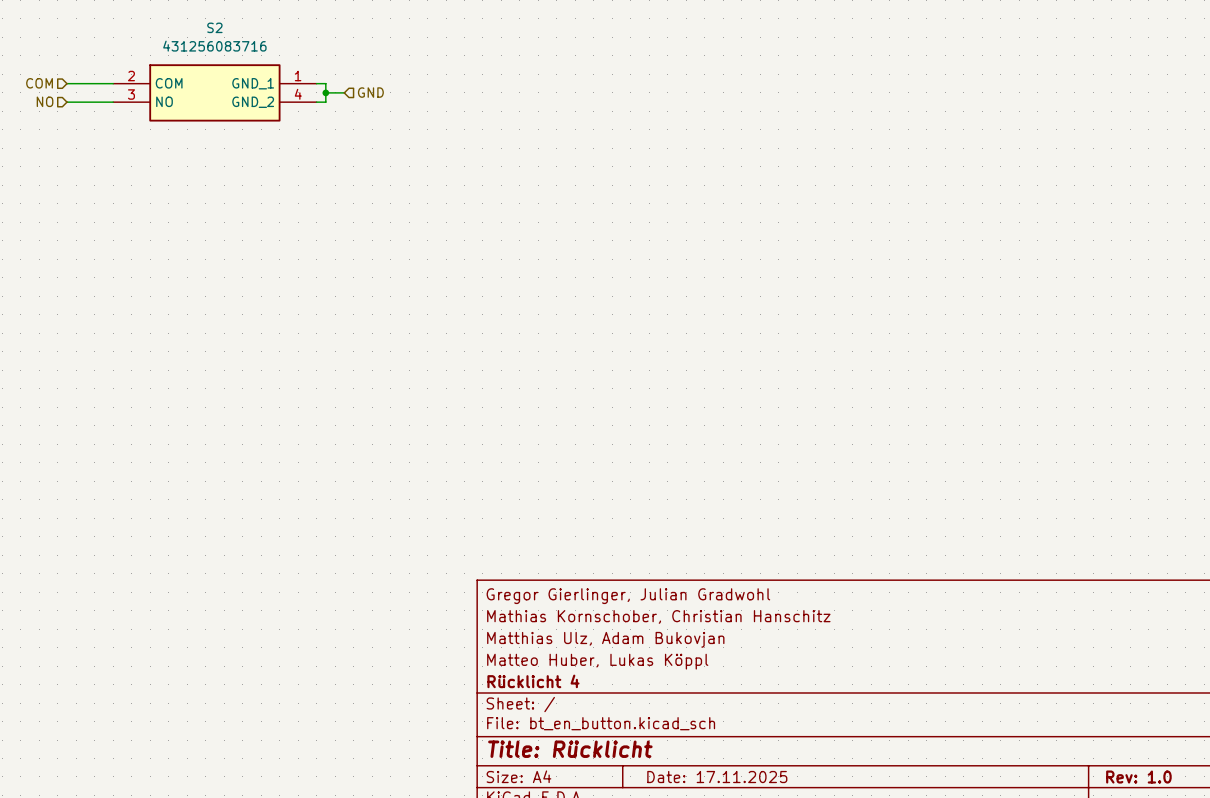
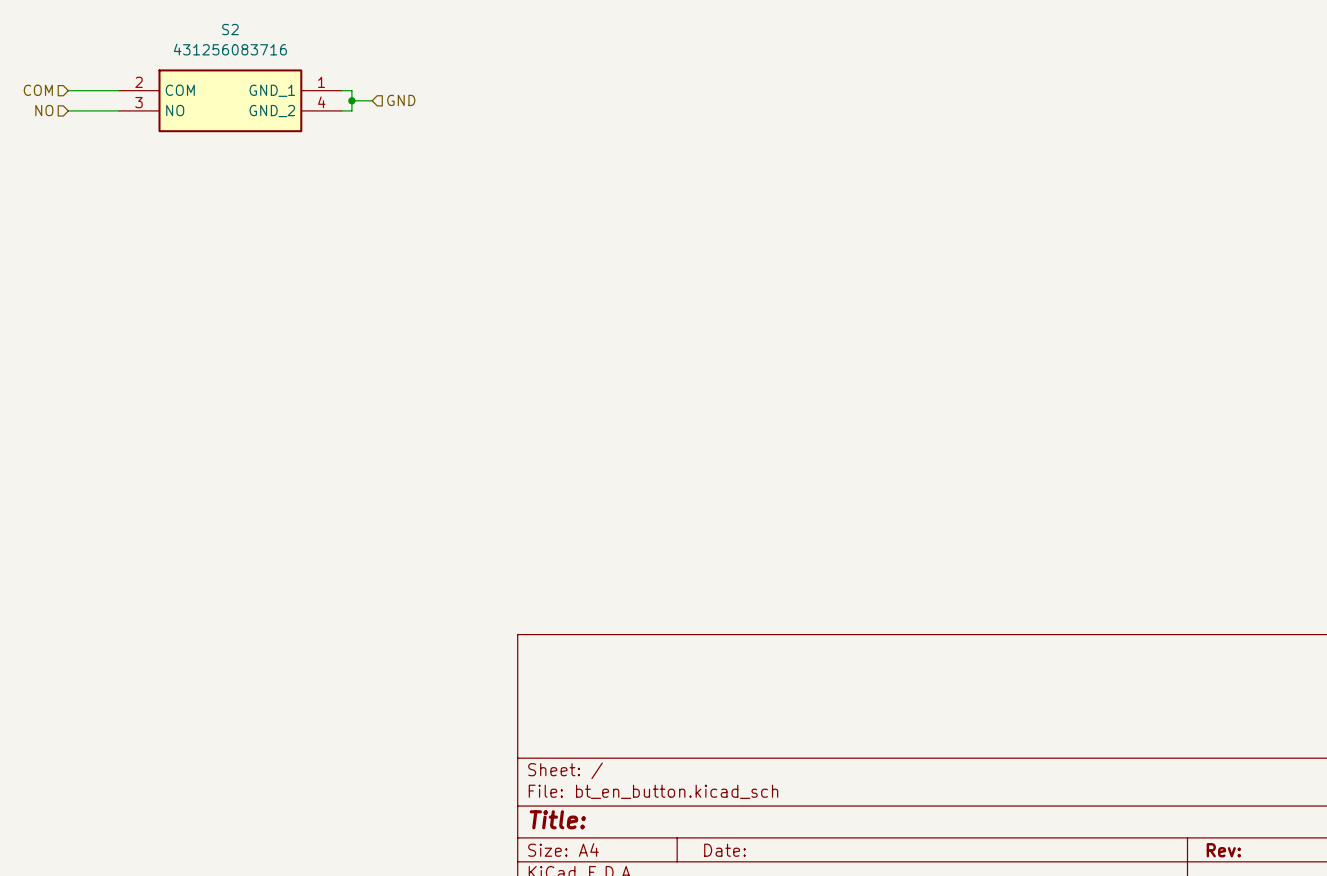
title block: Gregor Gierlinger, Julian Gradwohl (628, 596) -> none
title block: Mathias Kornschober, Christian Hanschitz (658, 616) -> none
title block: Matthias Ulz, Adam Bukovjan (605, 639) -> none
title block: Matteo Huber, Lukas Köppl (597, 661) -> none
title block: Rücklicht 4 (533, 681) -> none
title block: Title: Rücklicht (570, 749) -> Title: (557, 819)
title block: Date: 17.11.2025 (717, 777) -> Date: (724, 850)
title block: Rev: 1.0 (1138, 777) -> Rev: (1223, 850)

